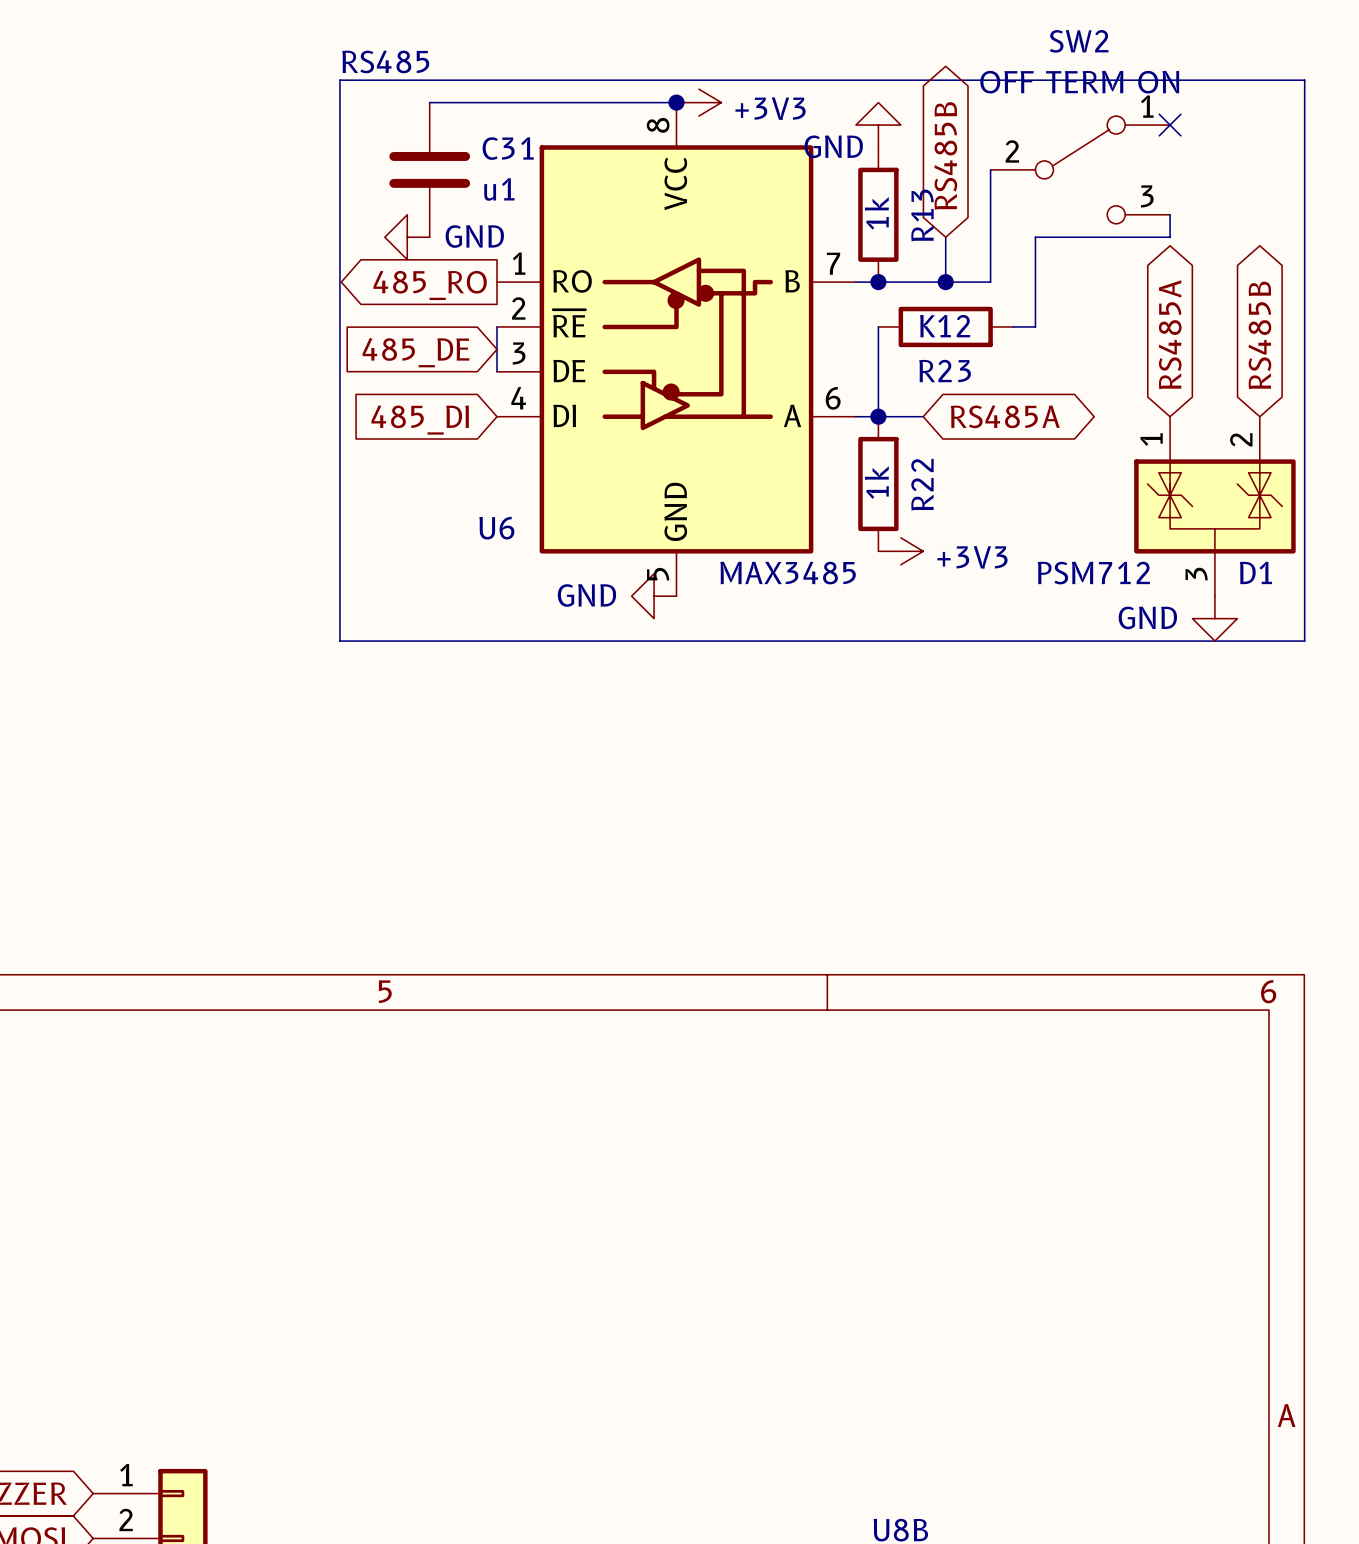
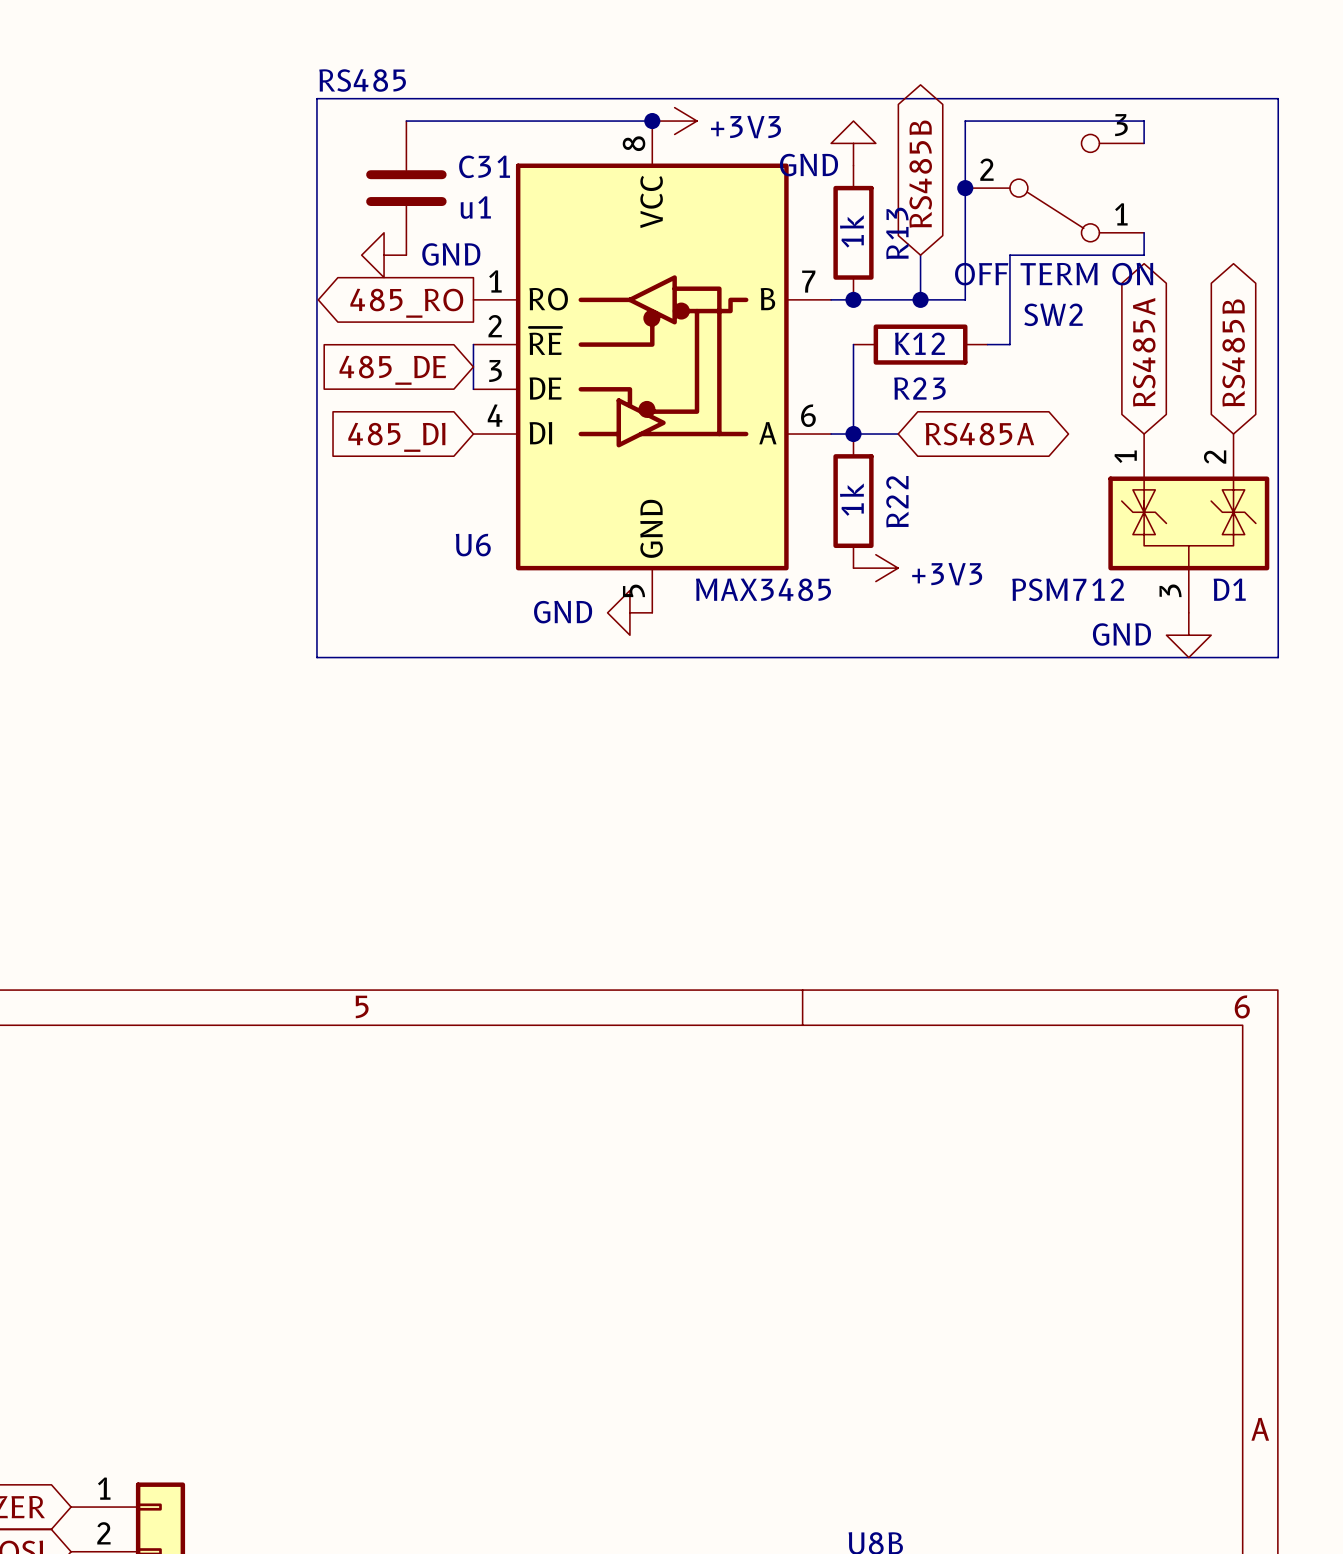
wire: none -> (1144, 143) (1144, 121) (965, 121) (965, 188)
no-connect mark: (1170, 125) -> none
junction: none -> (965, 188)
SW2 flip: as is (1080, 169) -> up-down (1054, 188)

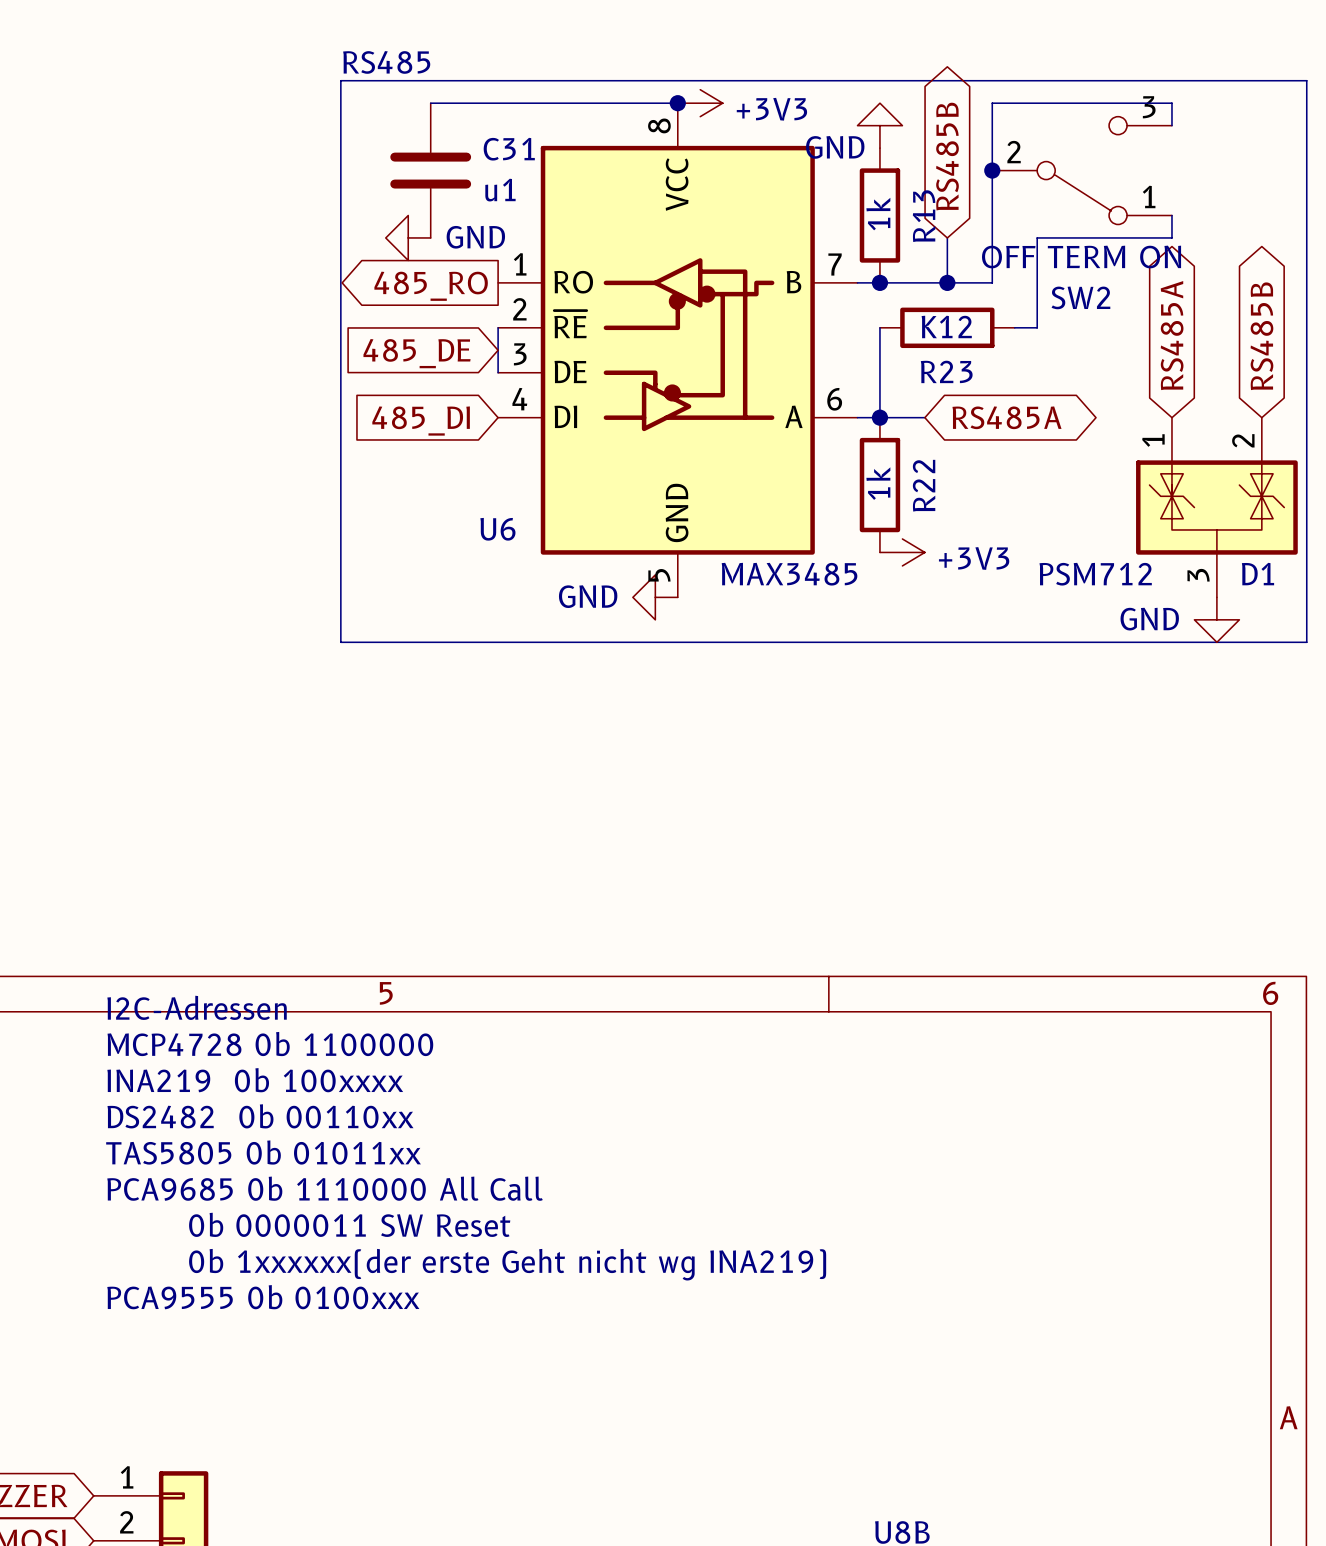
text: none -> I2C-Adressen (197, 1007)
text: none -> MCP4728 0b 1100000 (270, 1044)
text: none -> INA219 0b 100xxxx (255, 1080)
text: none -> DS2482 0b 00110xx (260, 1116)
text: none -> TAS5805 0b 01011xx (263, 1152)
text: none -> PCA9685 0b 1110000 All Call (325, 1188)
text: none -> 0b 0000011 SW Reset (349, 1224)
text: none -> 0b 1xxxxxx(der erste Geht nicht wg INA219) (507, 1264)
text: none -> PCA9555 0b 0100xxx (263, 1297)

